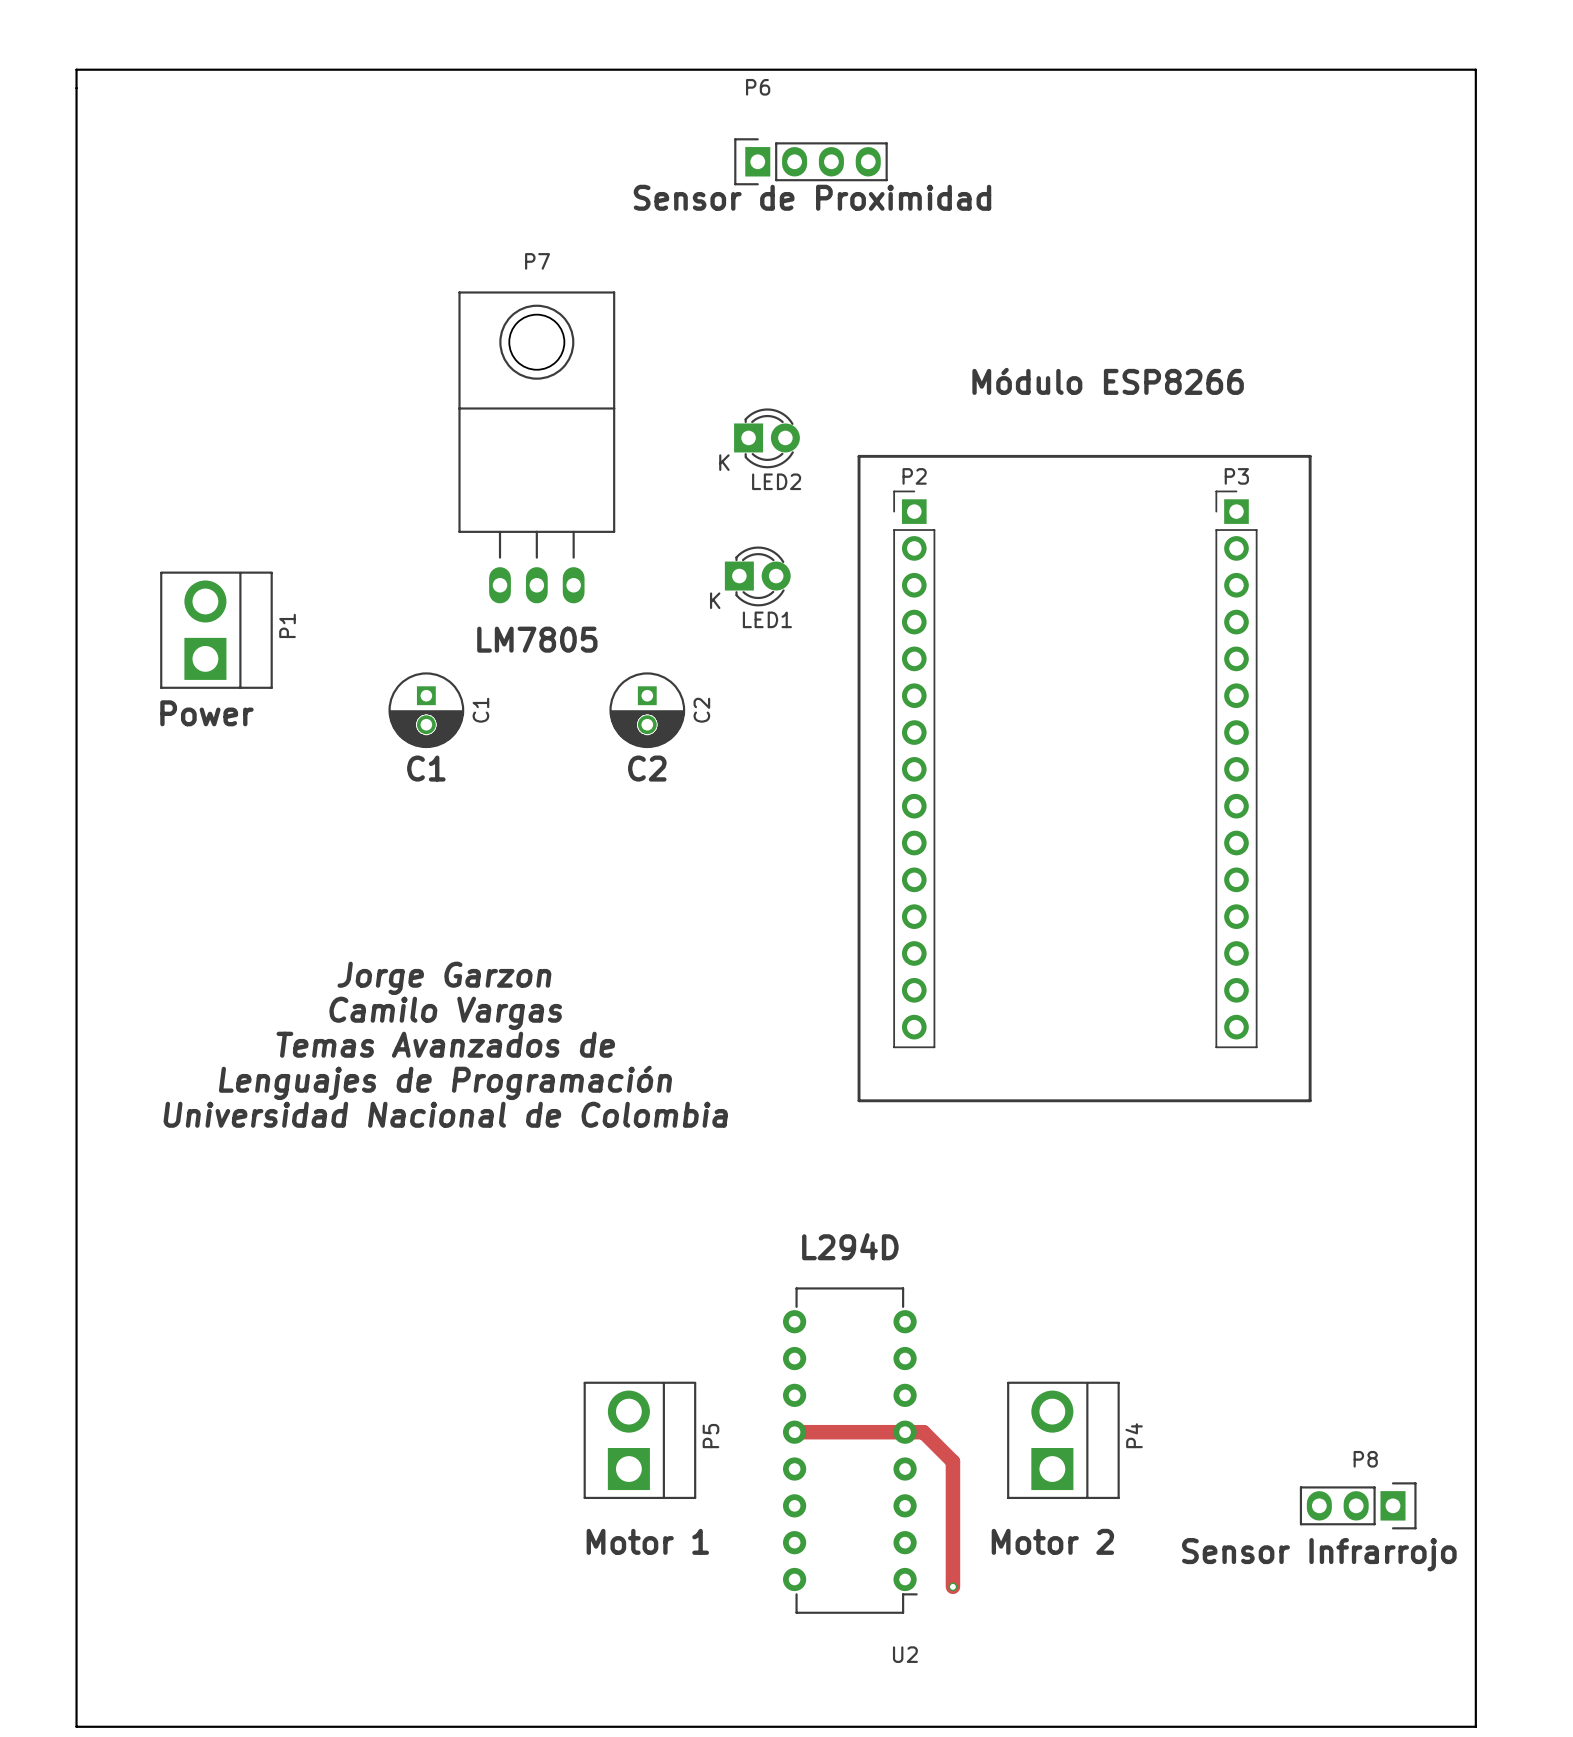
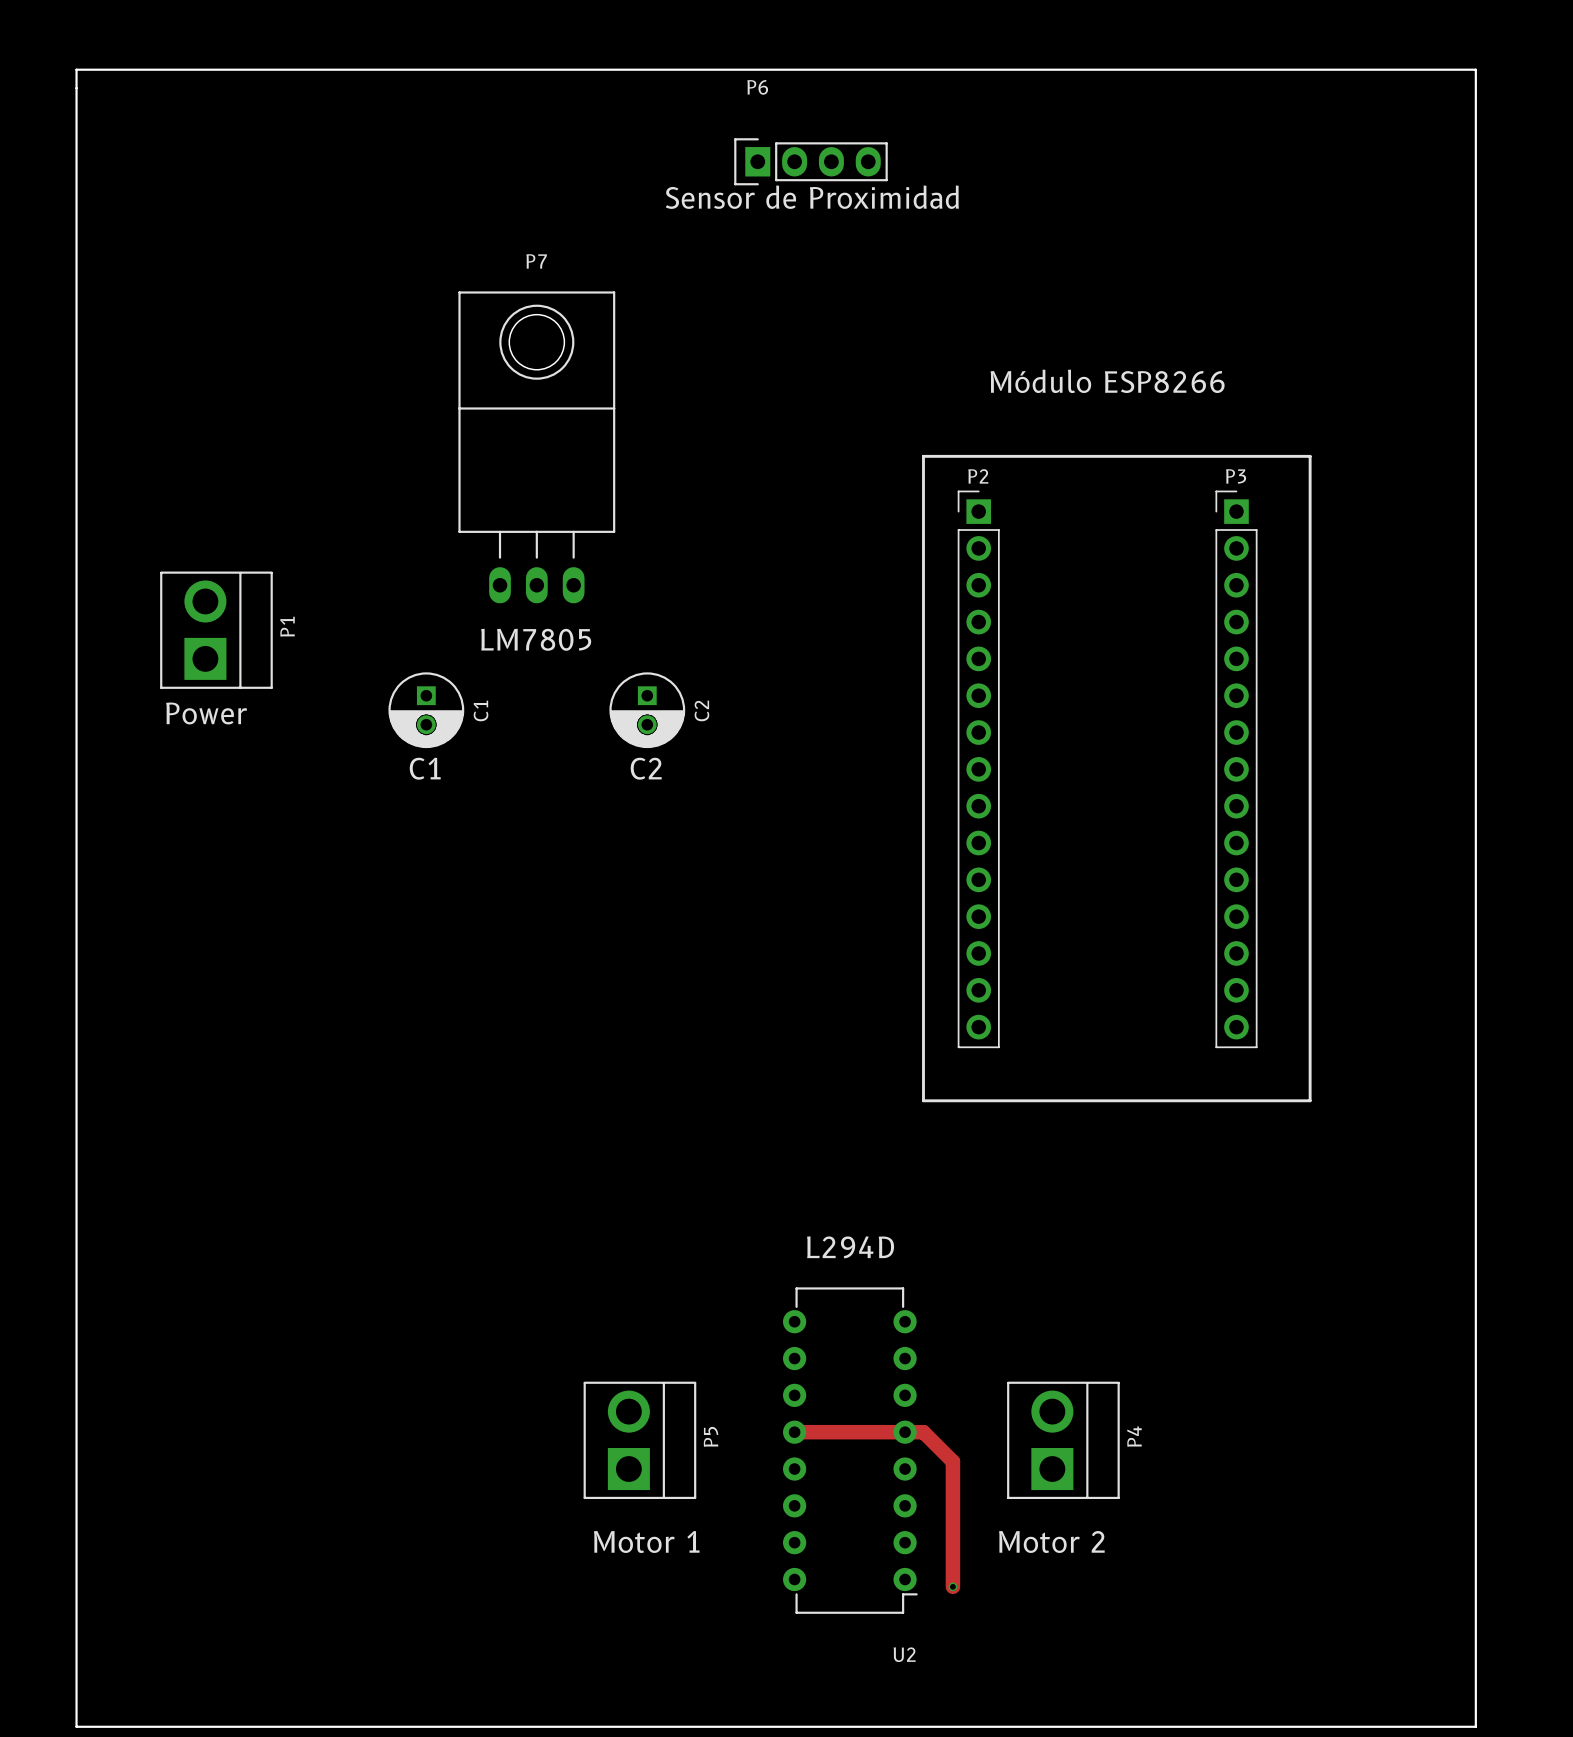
LED2: (766, 438) -> none
line: (923, 456) (859, 456) (859, 1100) (923, 1100) -> (923, 456) (923, 1100)
LED1: (757, 576) -> none
P2 position: (914, 769) -> (978, 769)
text: Jorge Garzon (444, 978) -> none
text: Camilo Vargas (445, 1013) -> none
text: Temas Avanzados de (445, 1044) -> none
text: Lenguajes de Programación (445, 1082) -> none
text: Universidad Nacional de Colombia (445, 1114) -> none
P8: (1358, 1505) -> none
text: Sensor Infrarrojo (1319, 1554) -> none

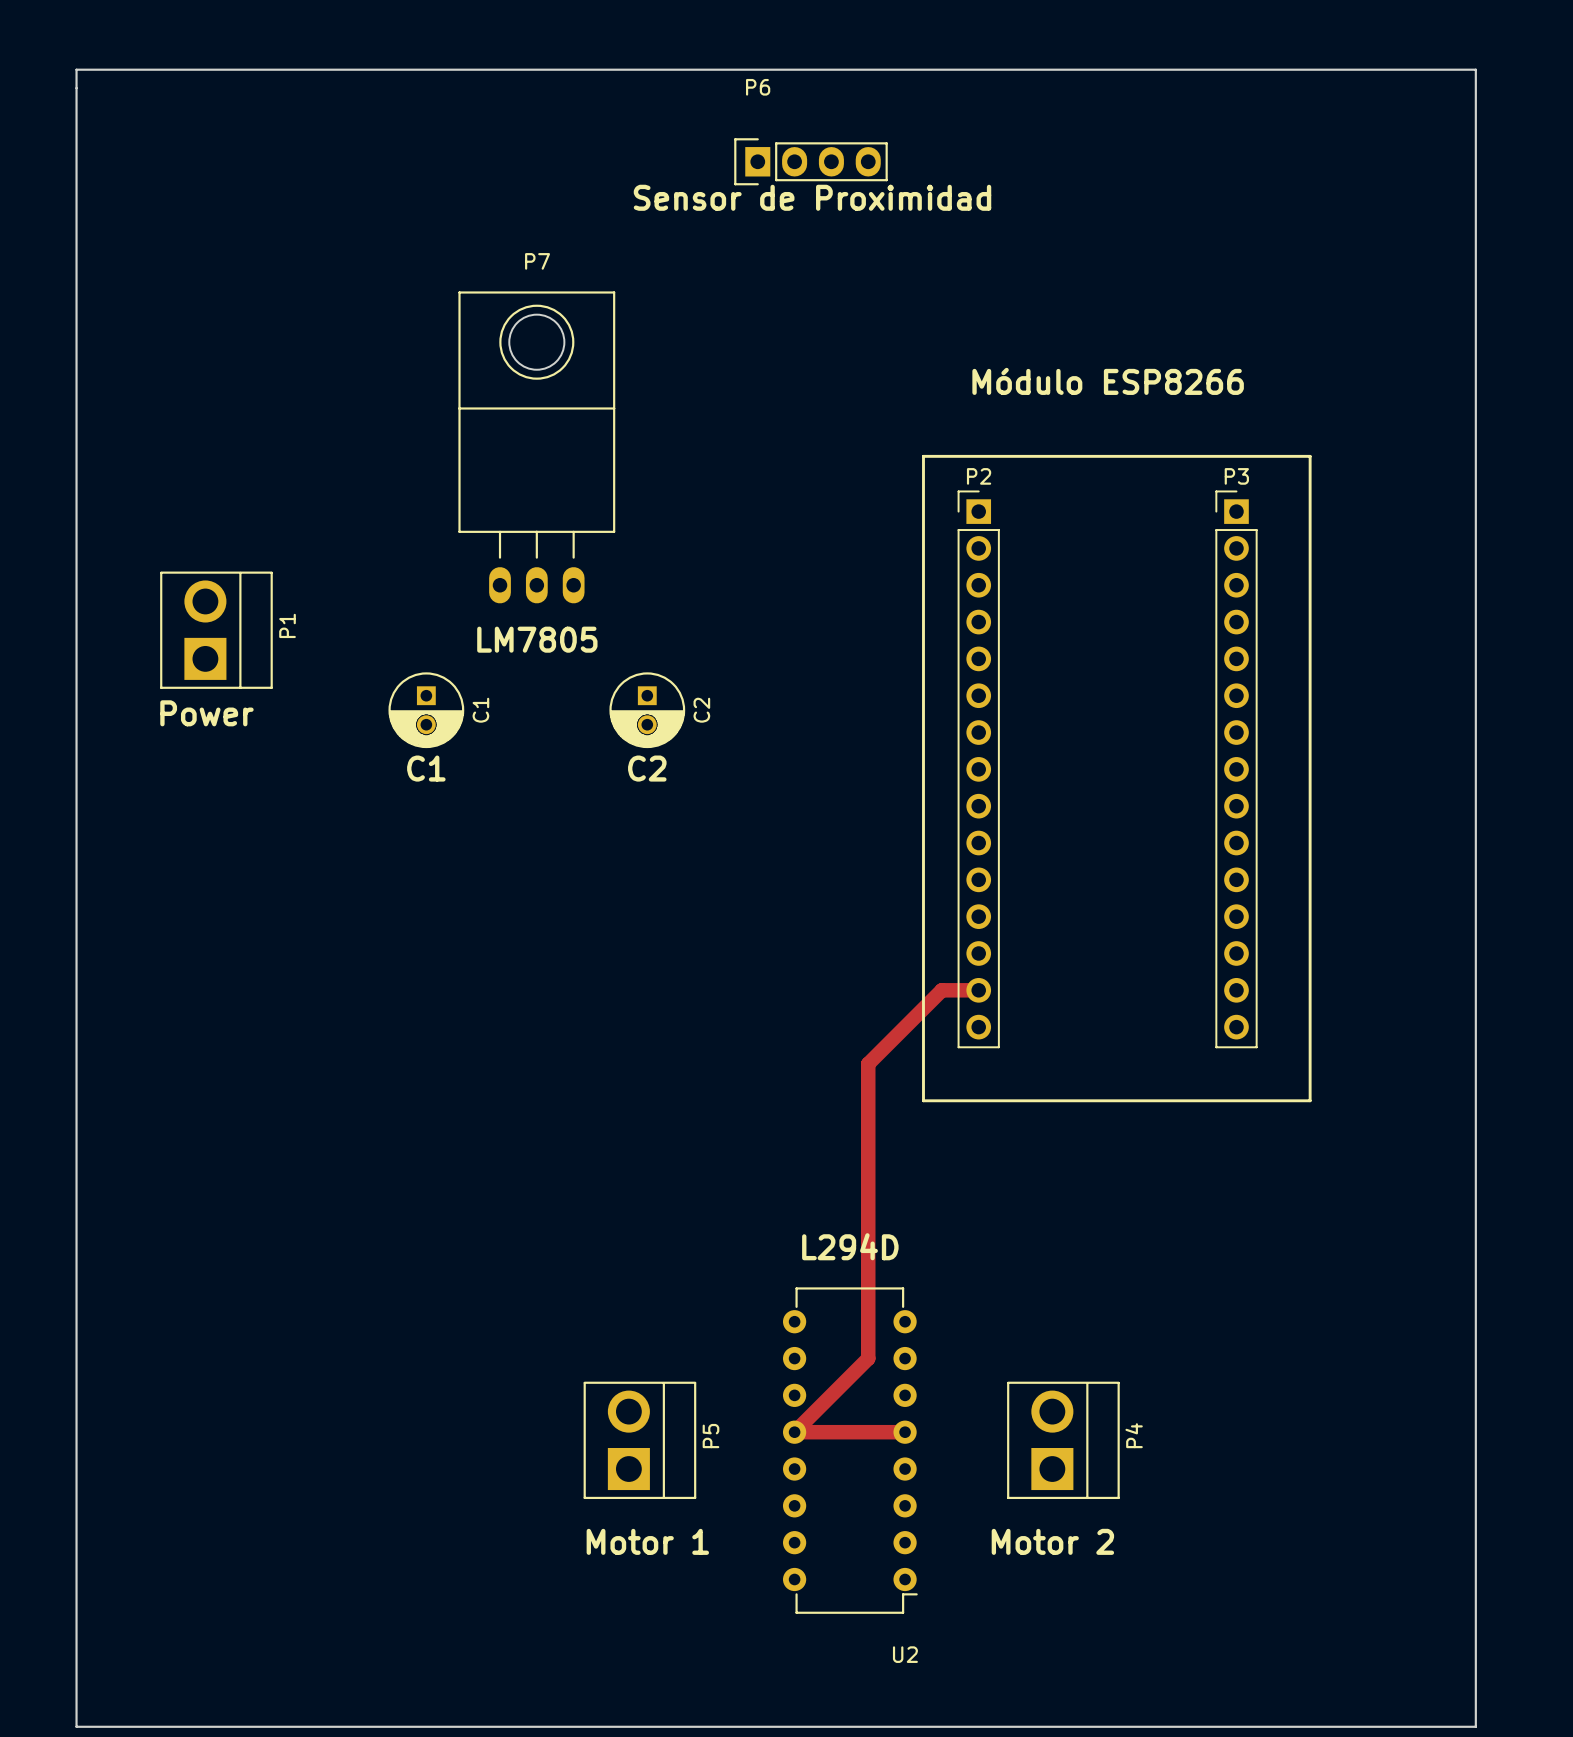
track: none -> (978, 990) (941, 990) (868, 1063) (868, 1358) (794, 1432)
track: (905, 1432) (923, 1432) (952, 1461) (952, 1586) -> none
via: (952, 1586) -> none

